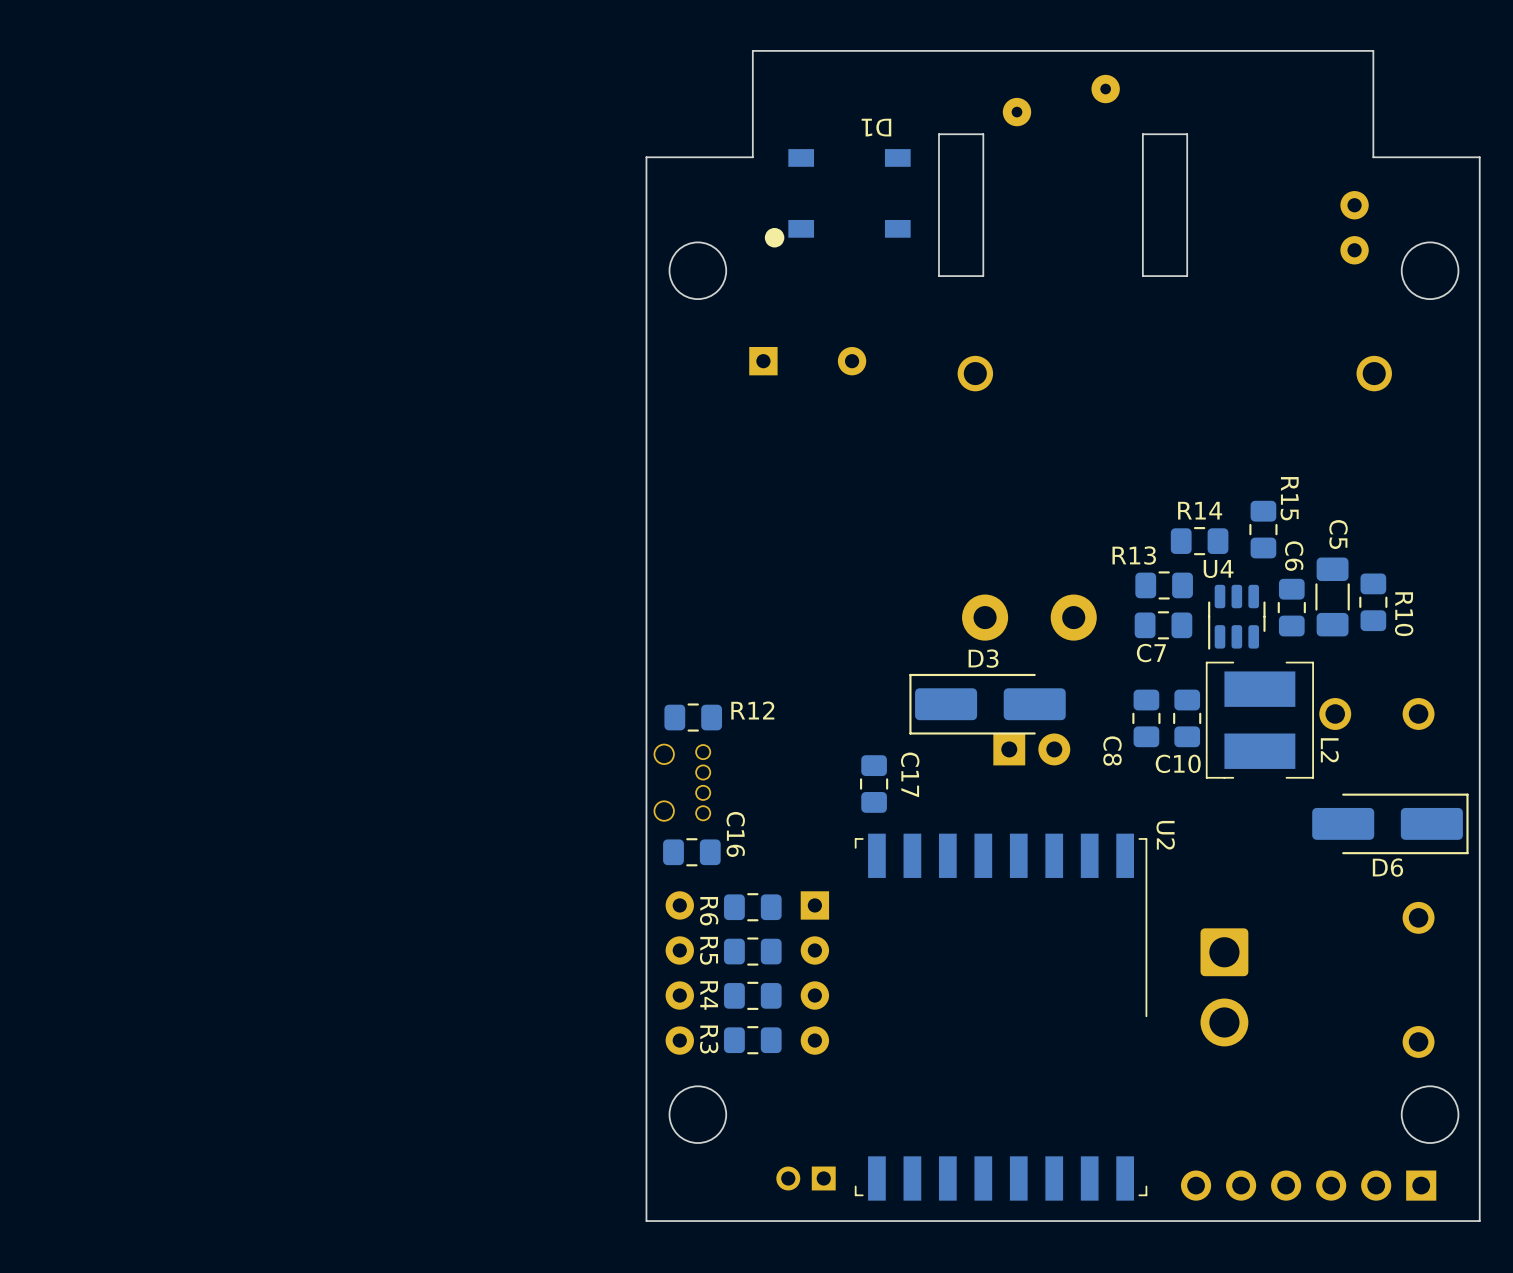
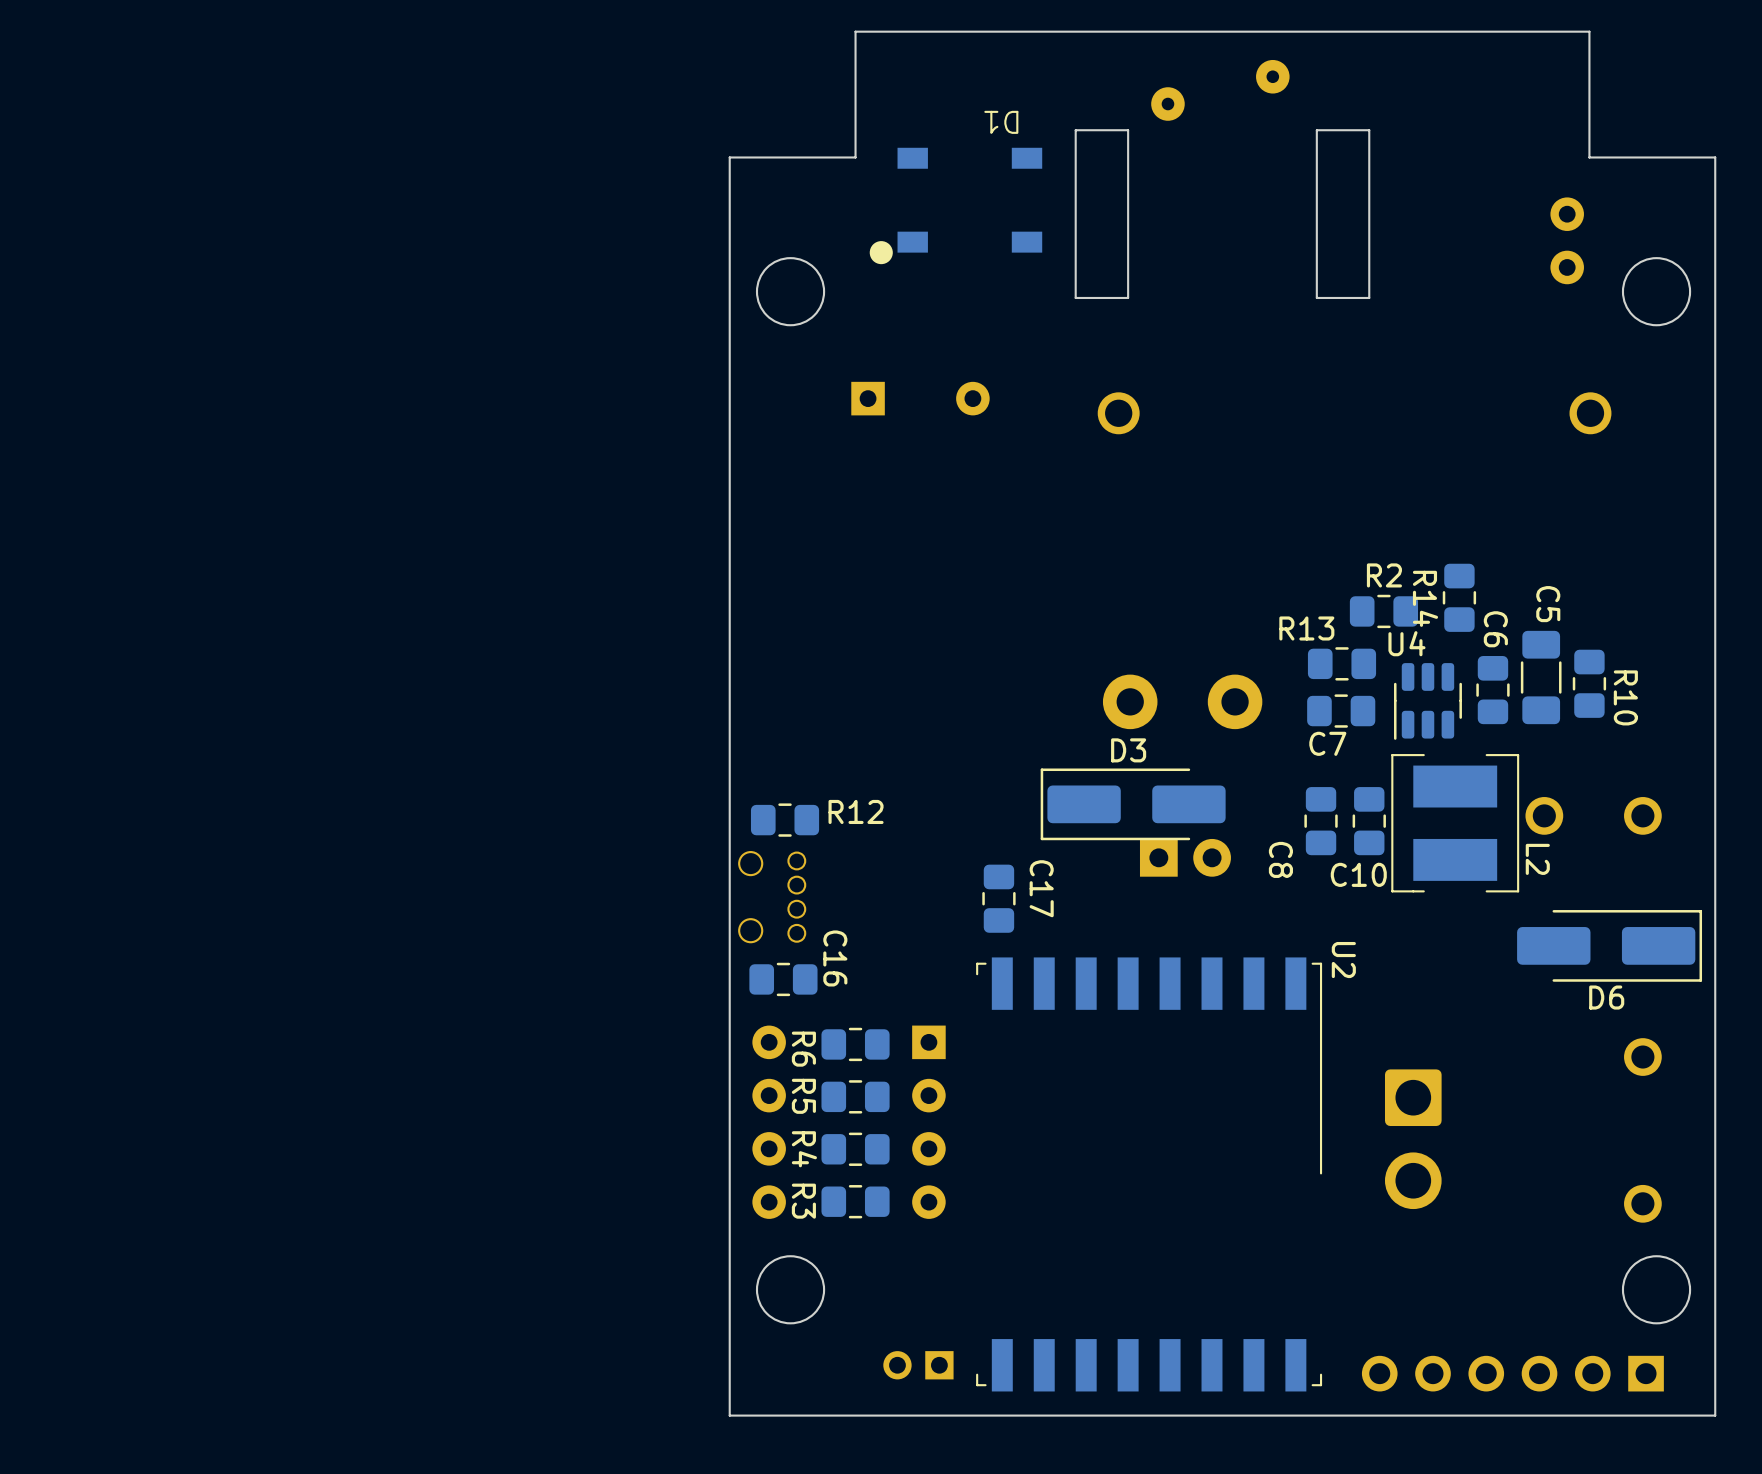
R15 name: R15 (1289, 498) -> R14 (1425, 598)
R14 name: R14 (1200, 510) -> R2 (1384, 575)

